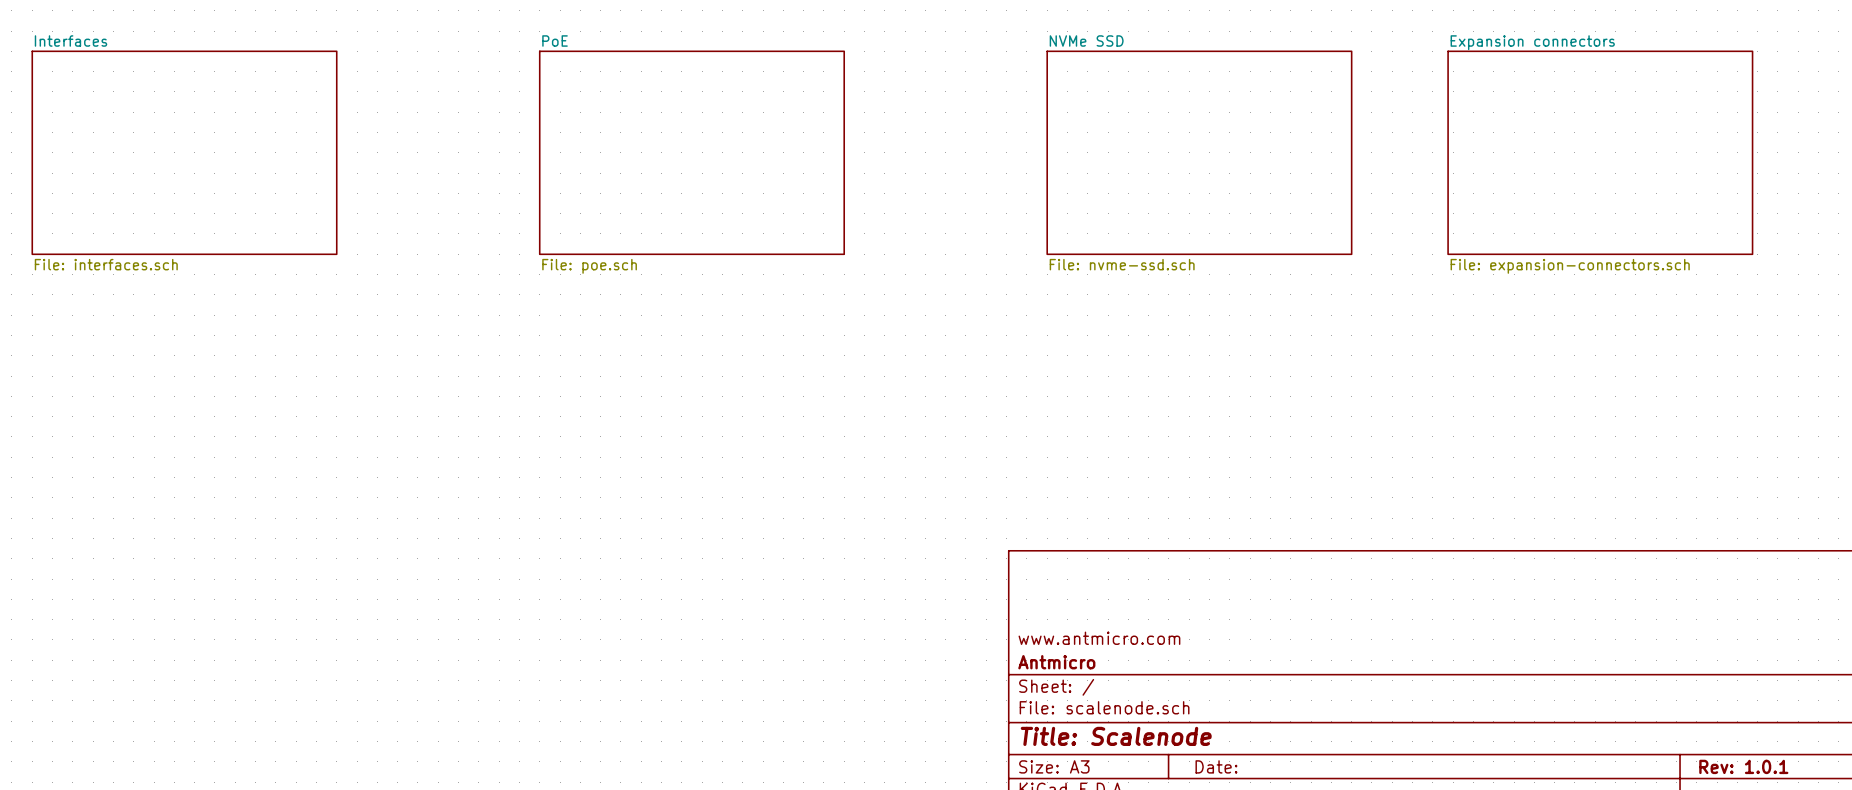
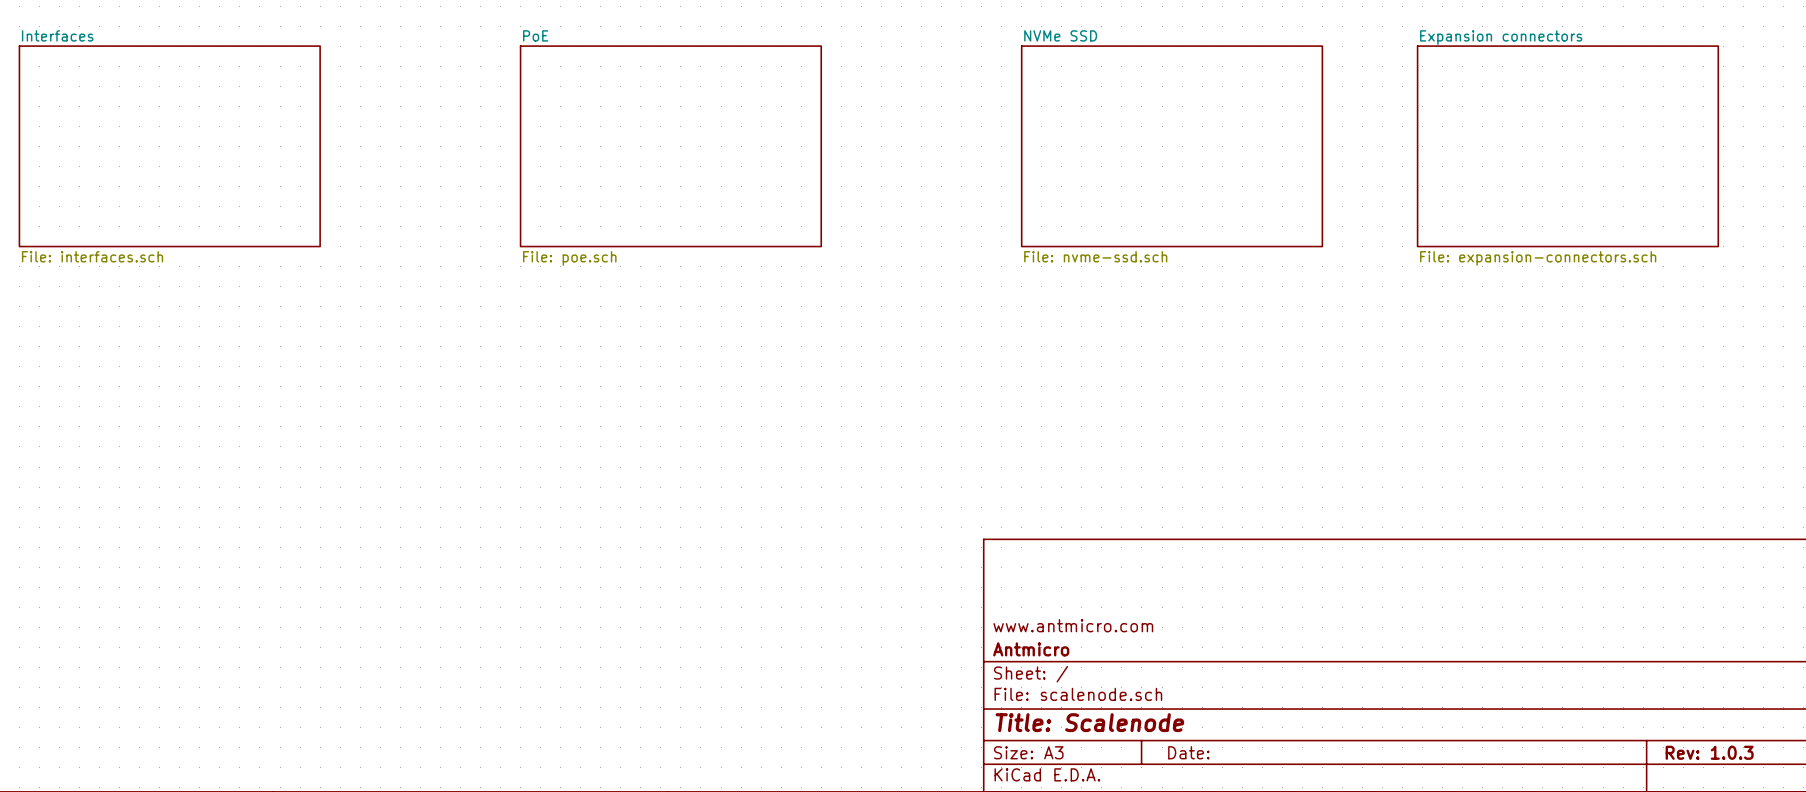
title block: Rev: 1.0.1 (1743, 766) -> Rev: 1.0.3 (1709, 752)

